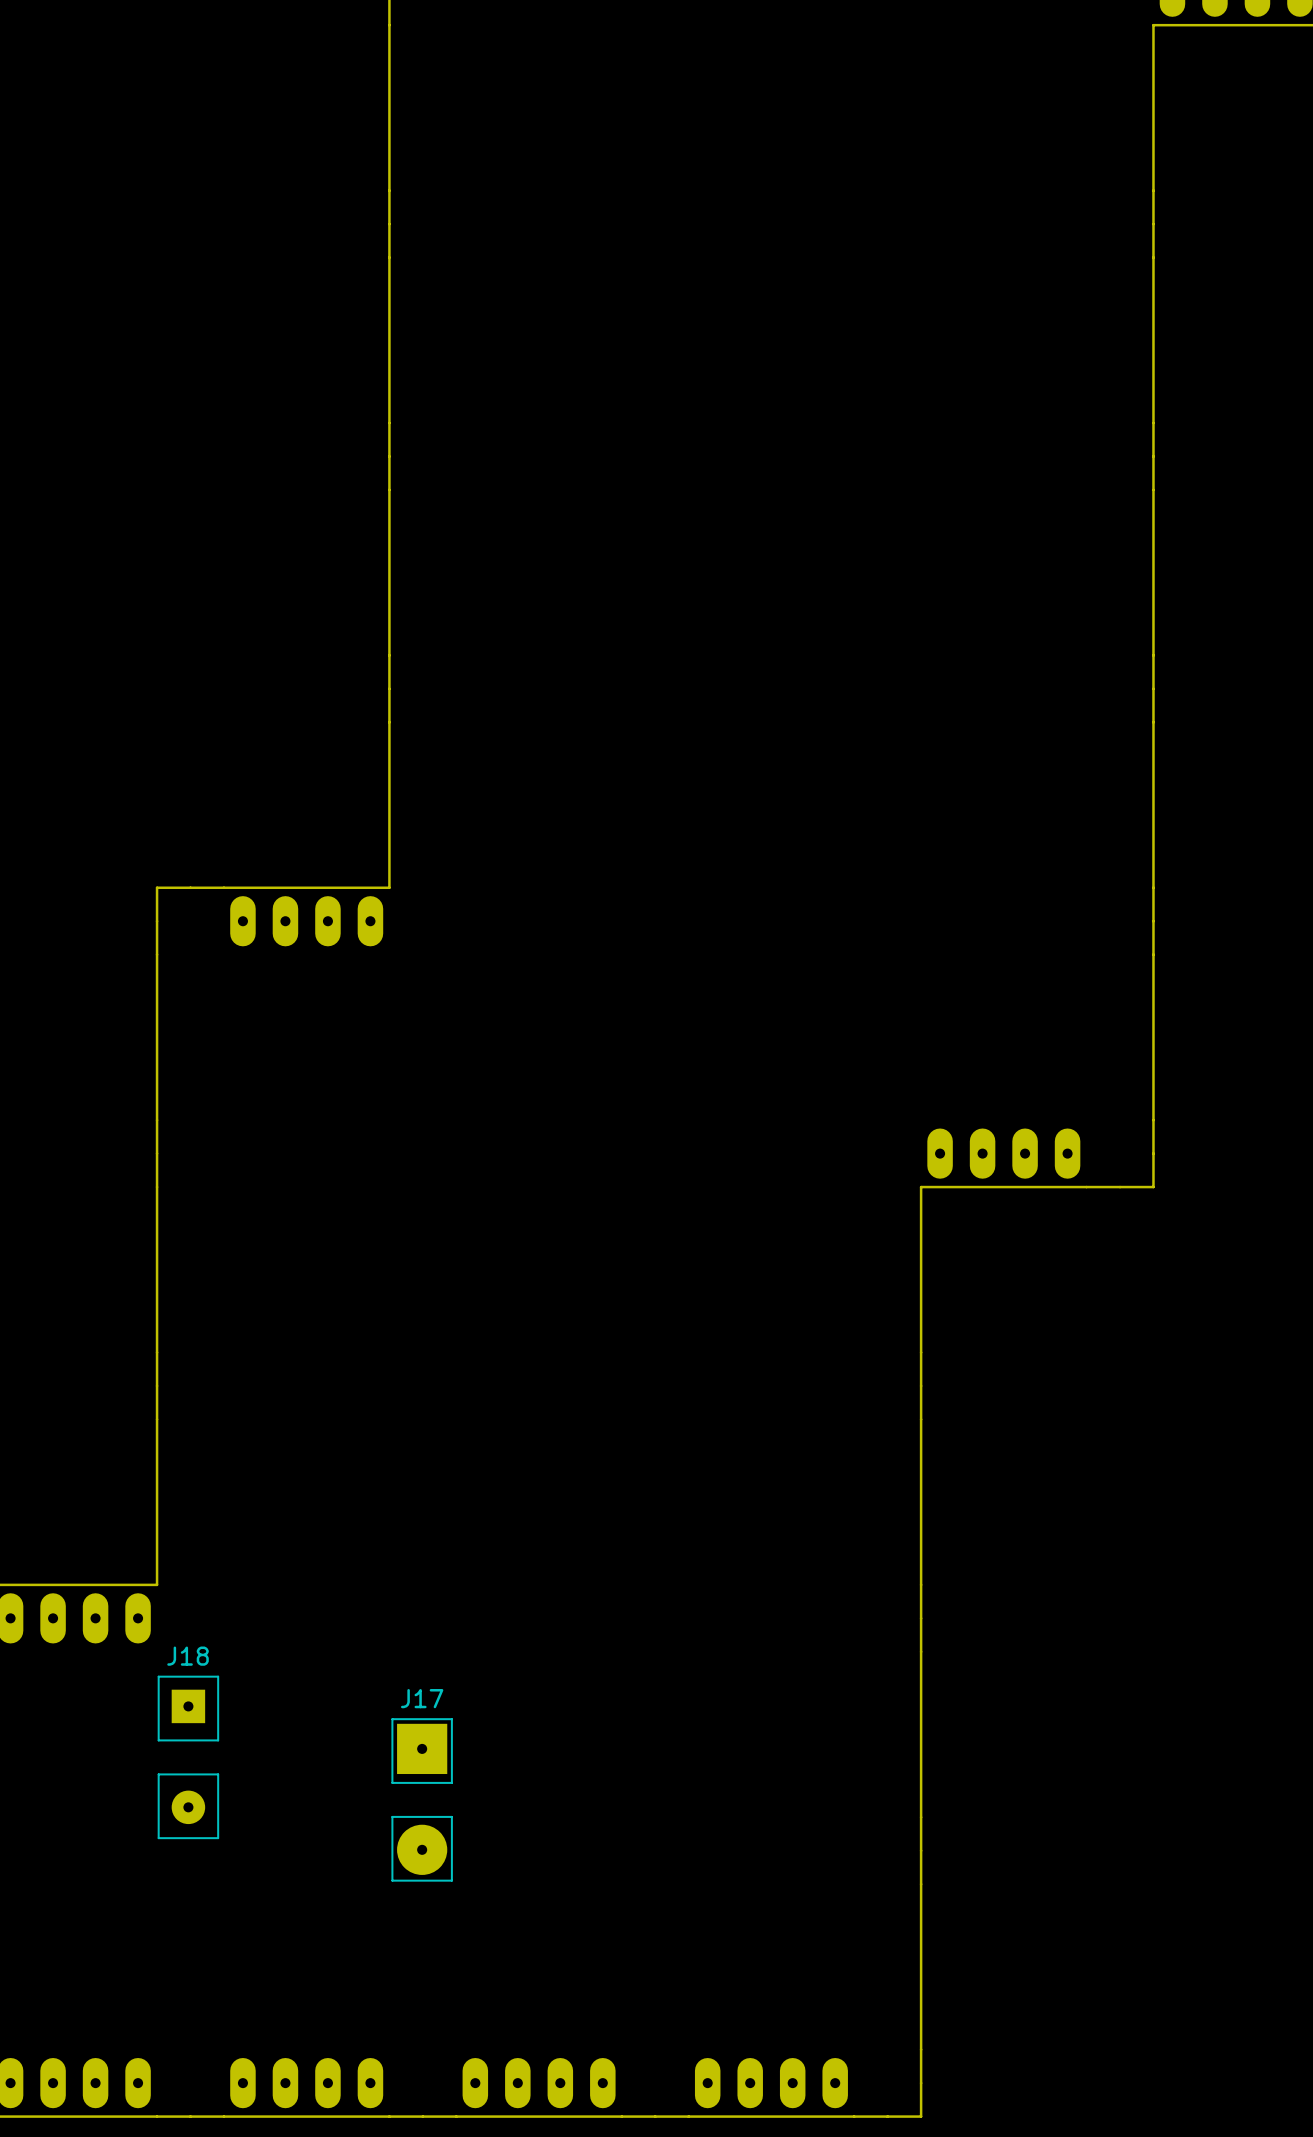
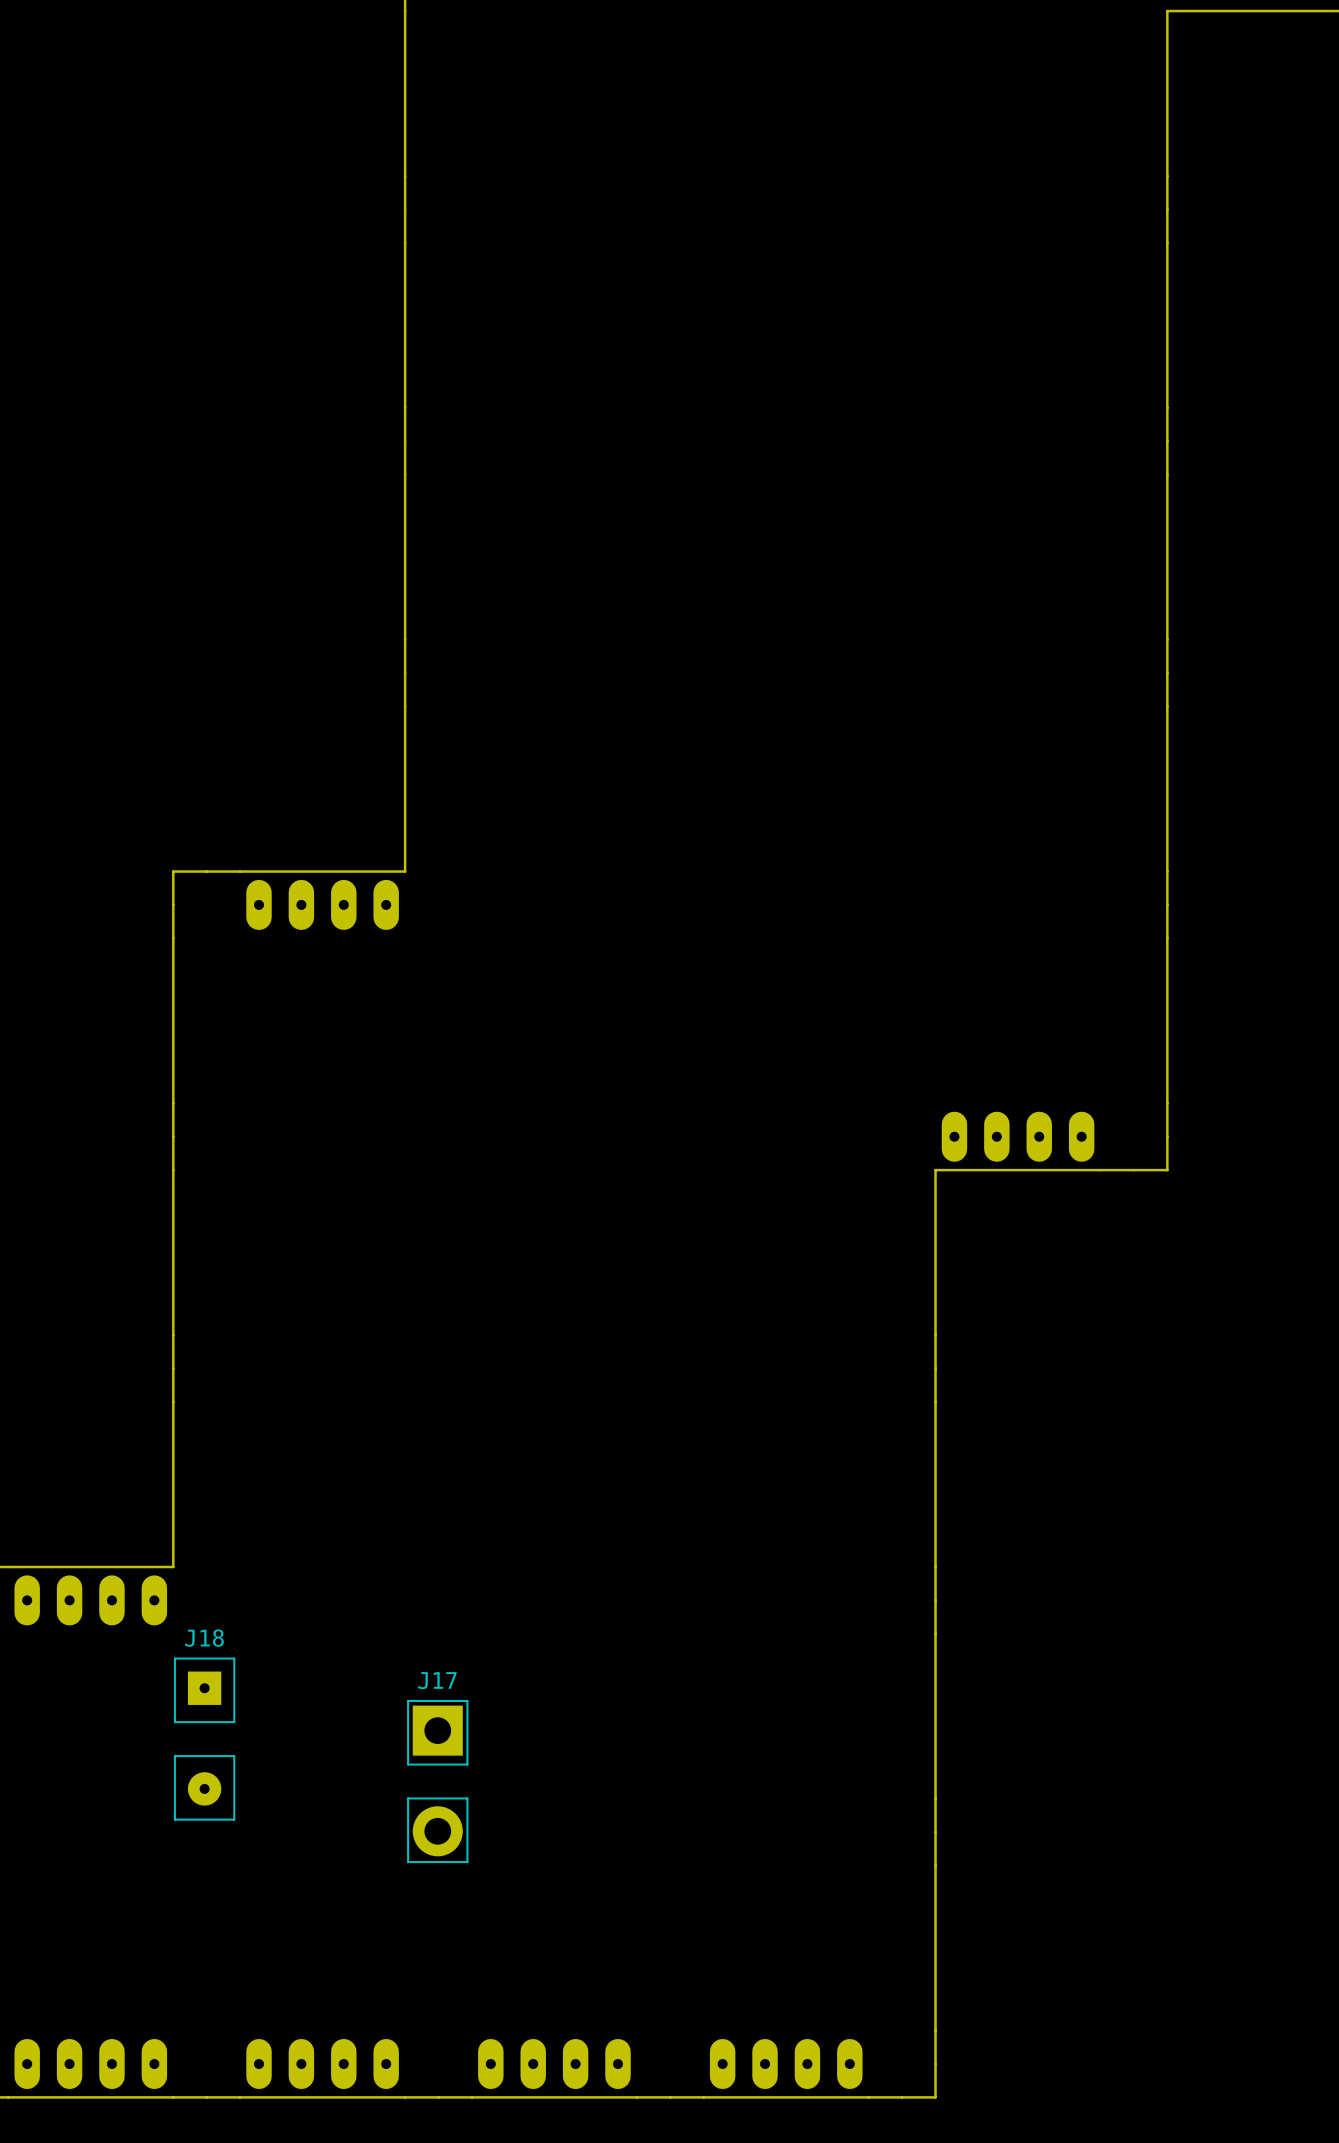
J17 footprint: [391, 1718, 453, 1882] -> [407, 1699, 469, 1864]

